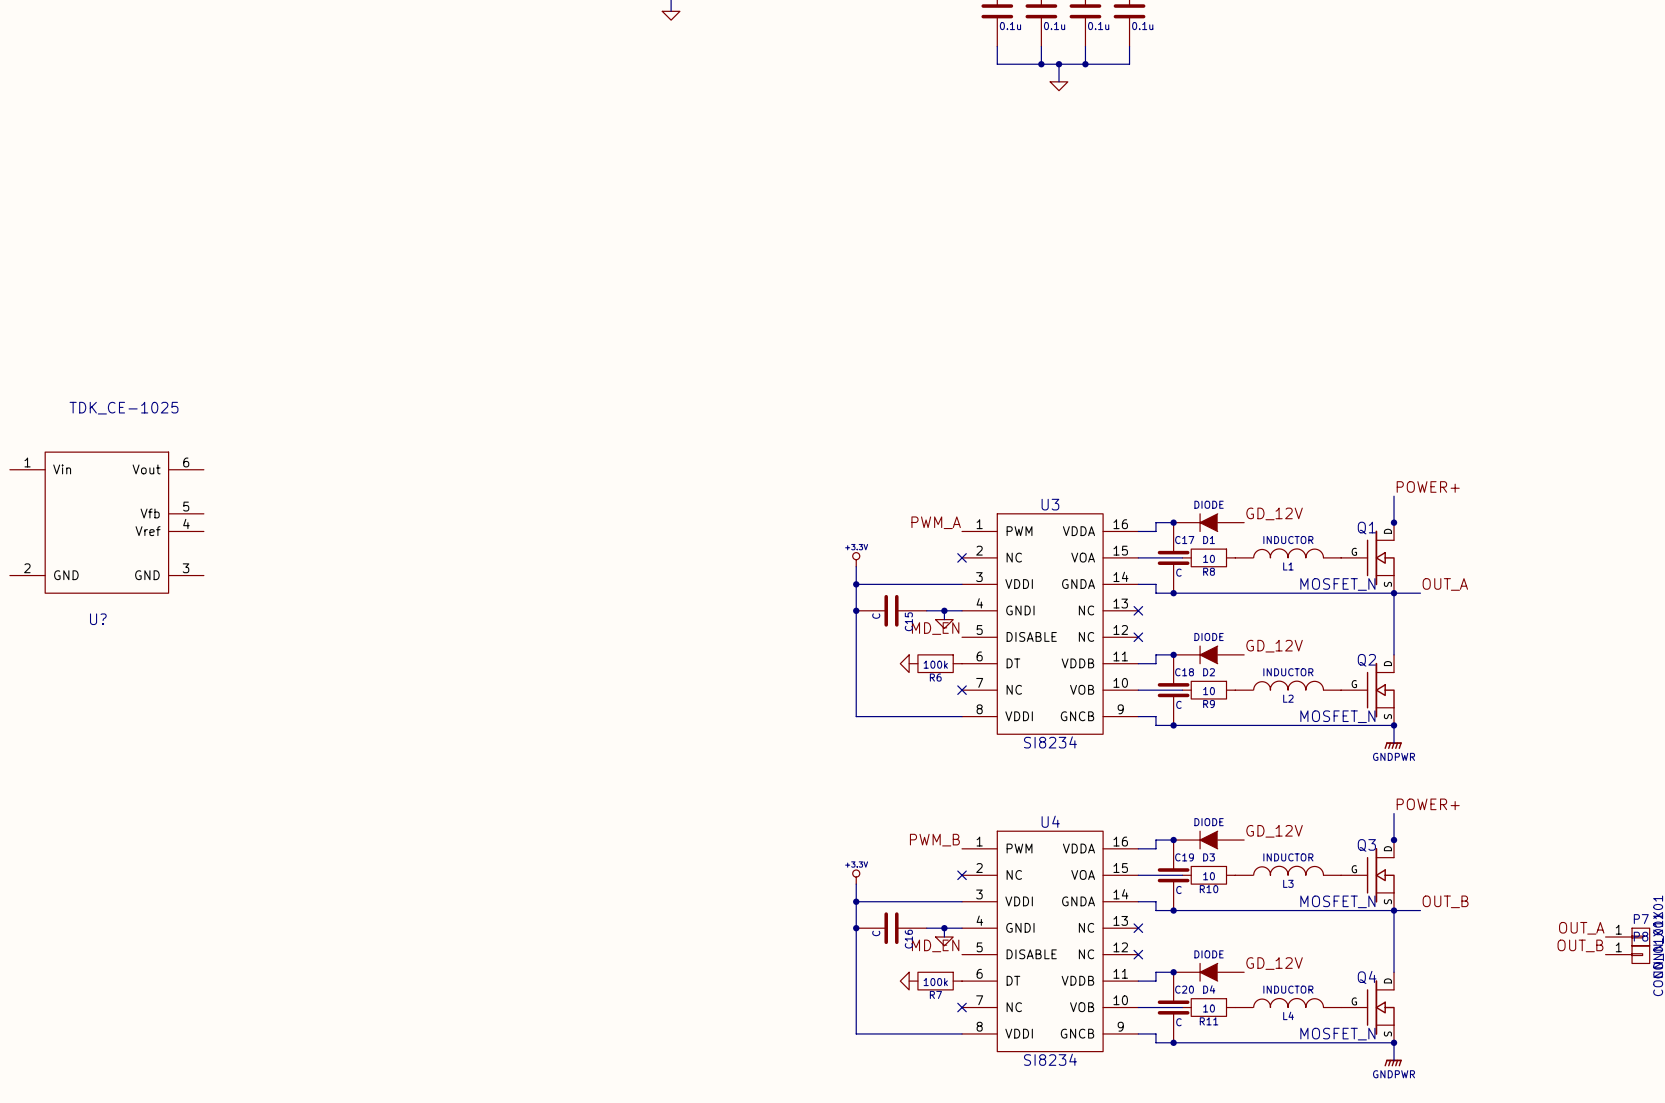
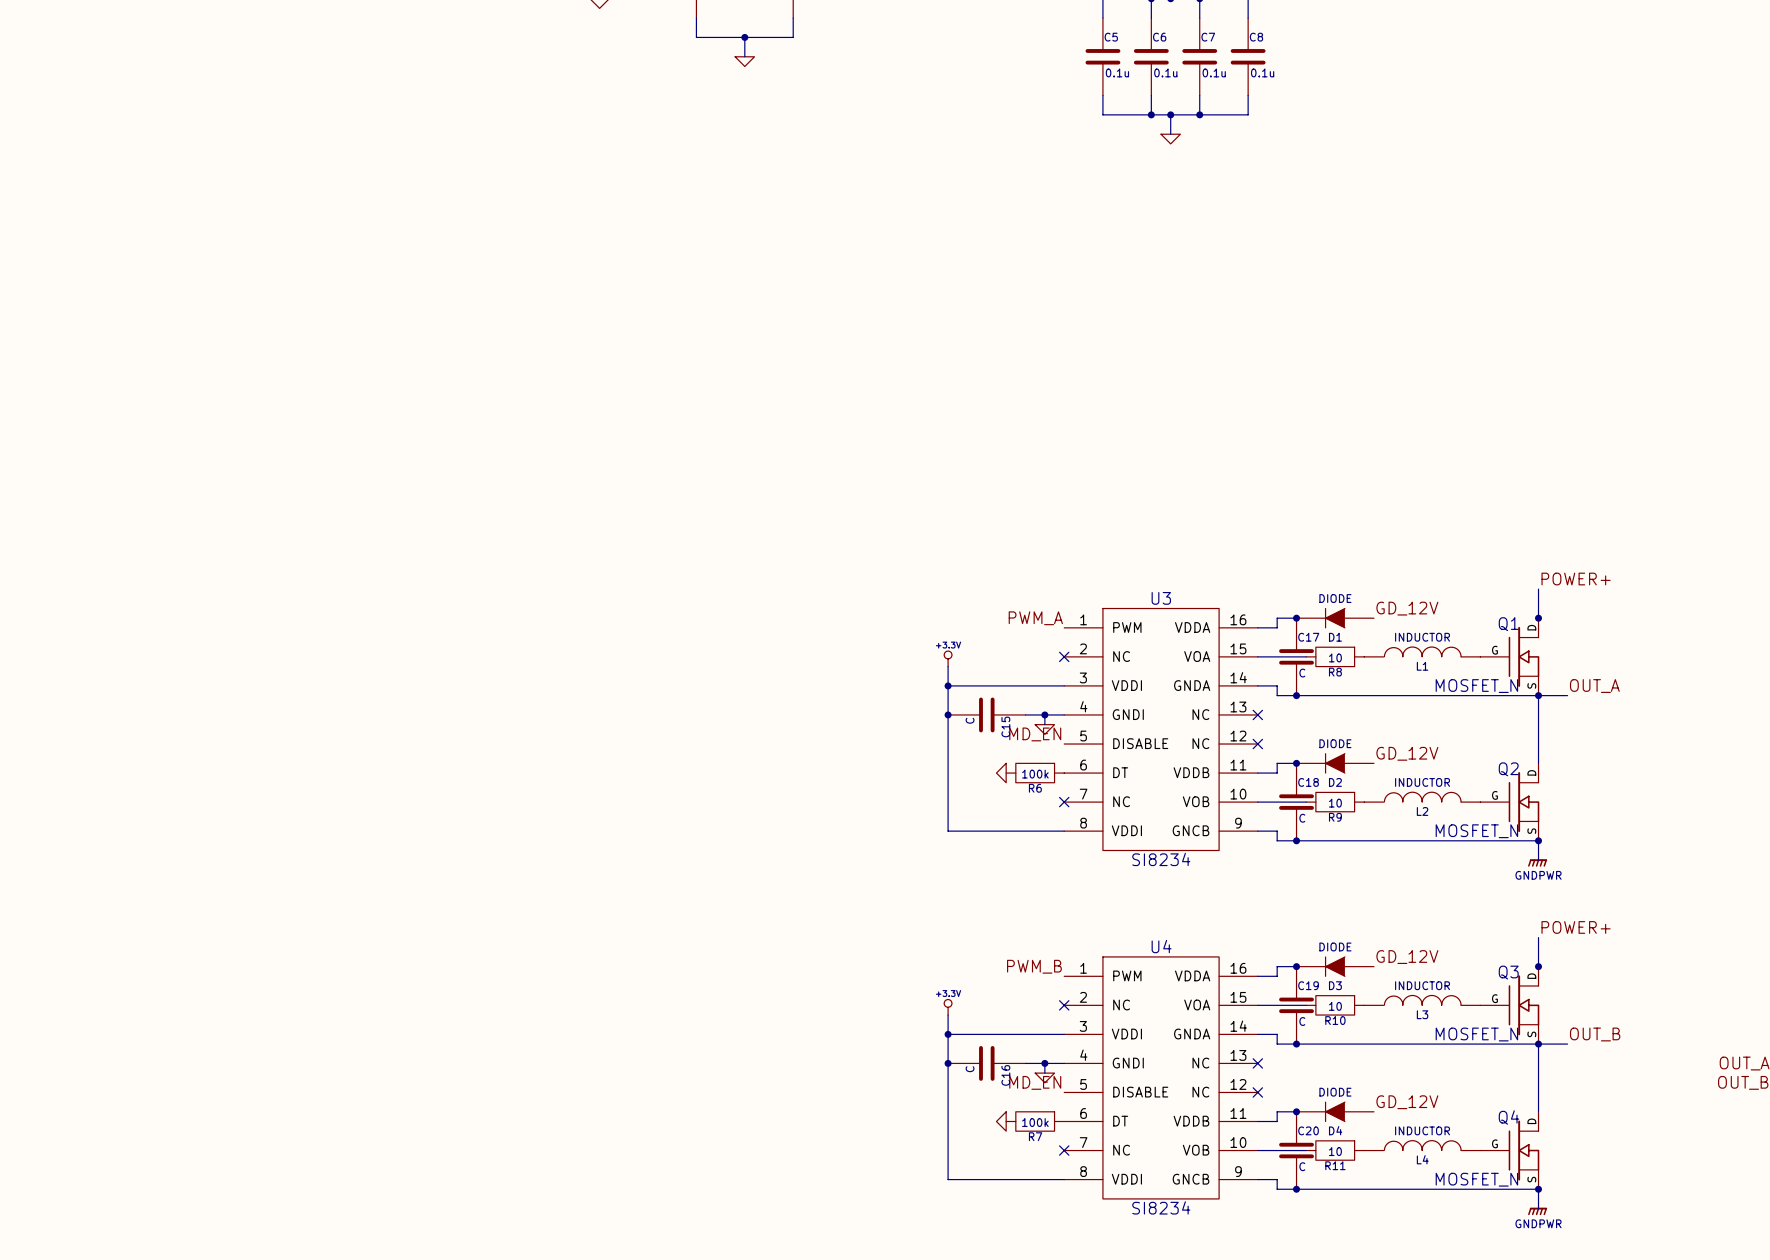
U?: TDK_CE-1025 (106, 522) -> none

